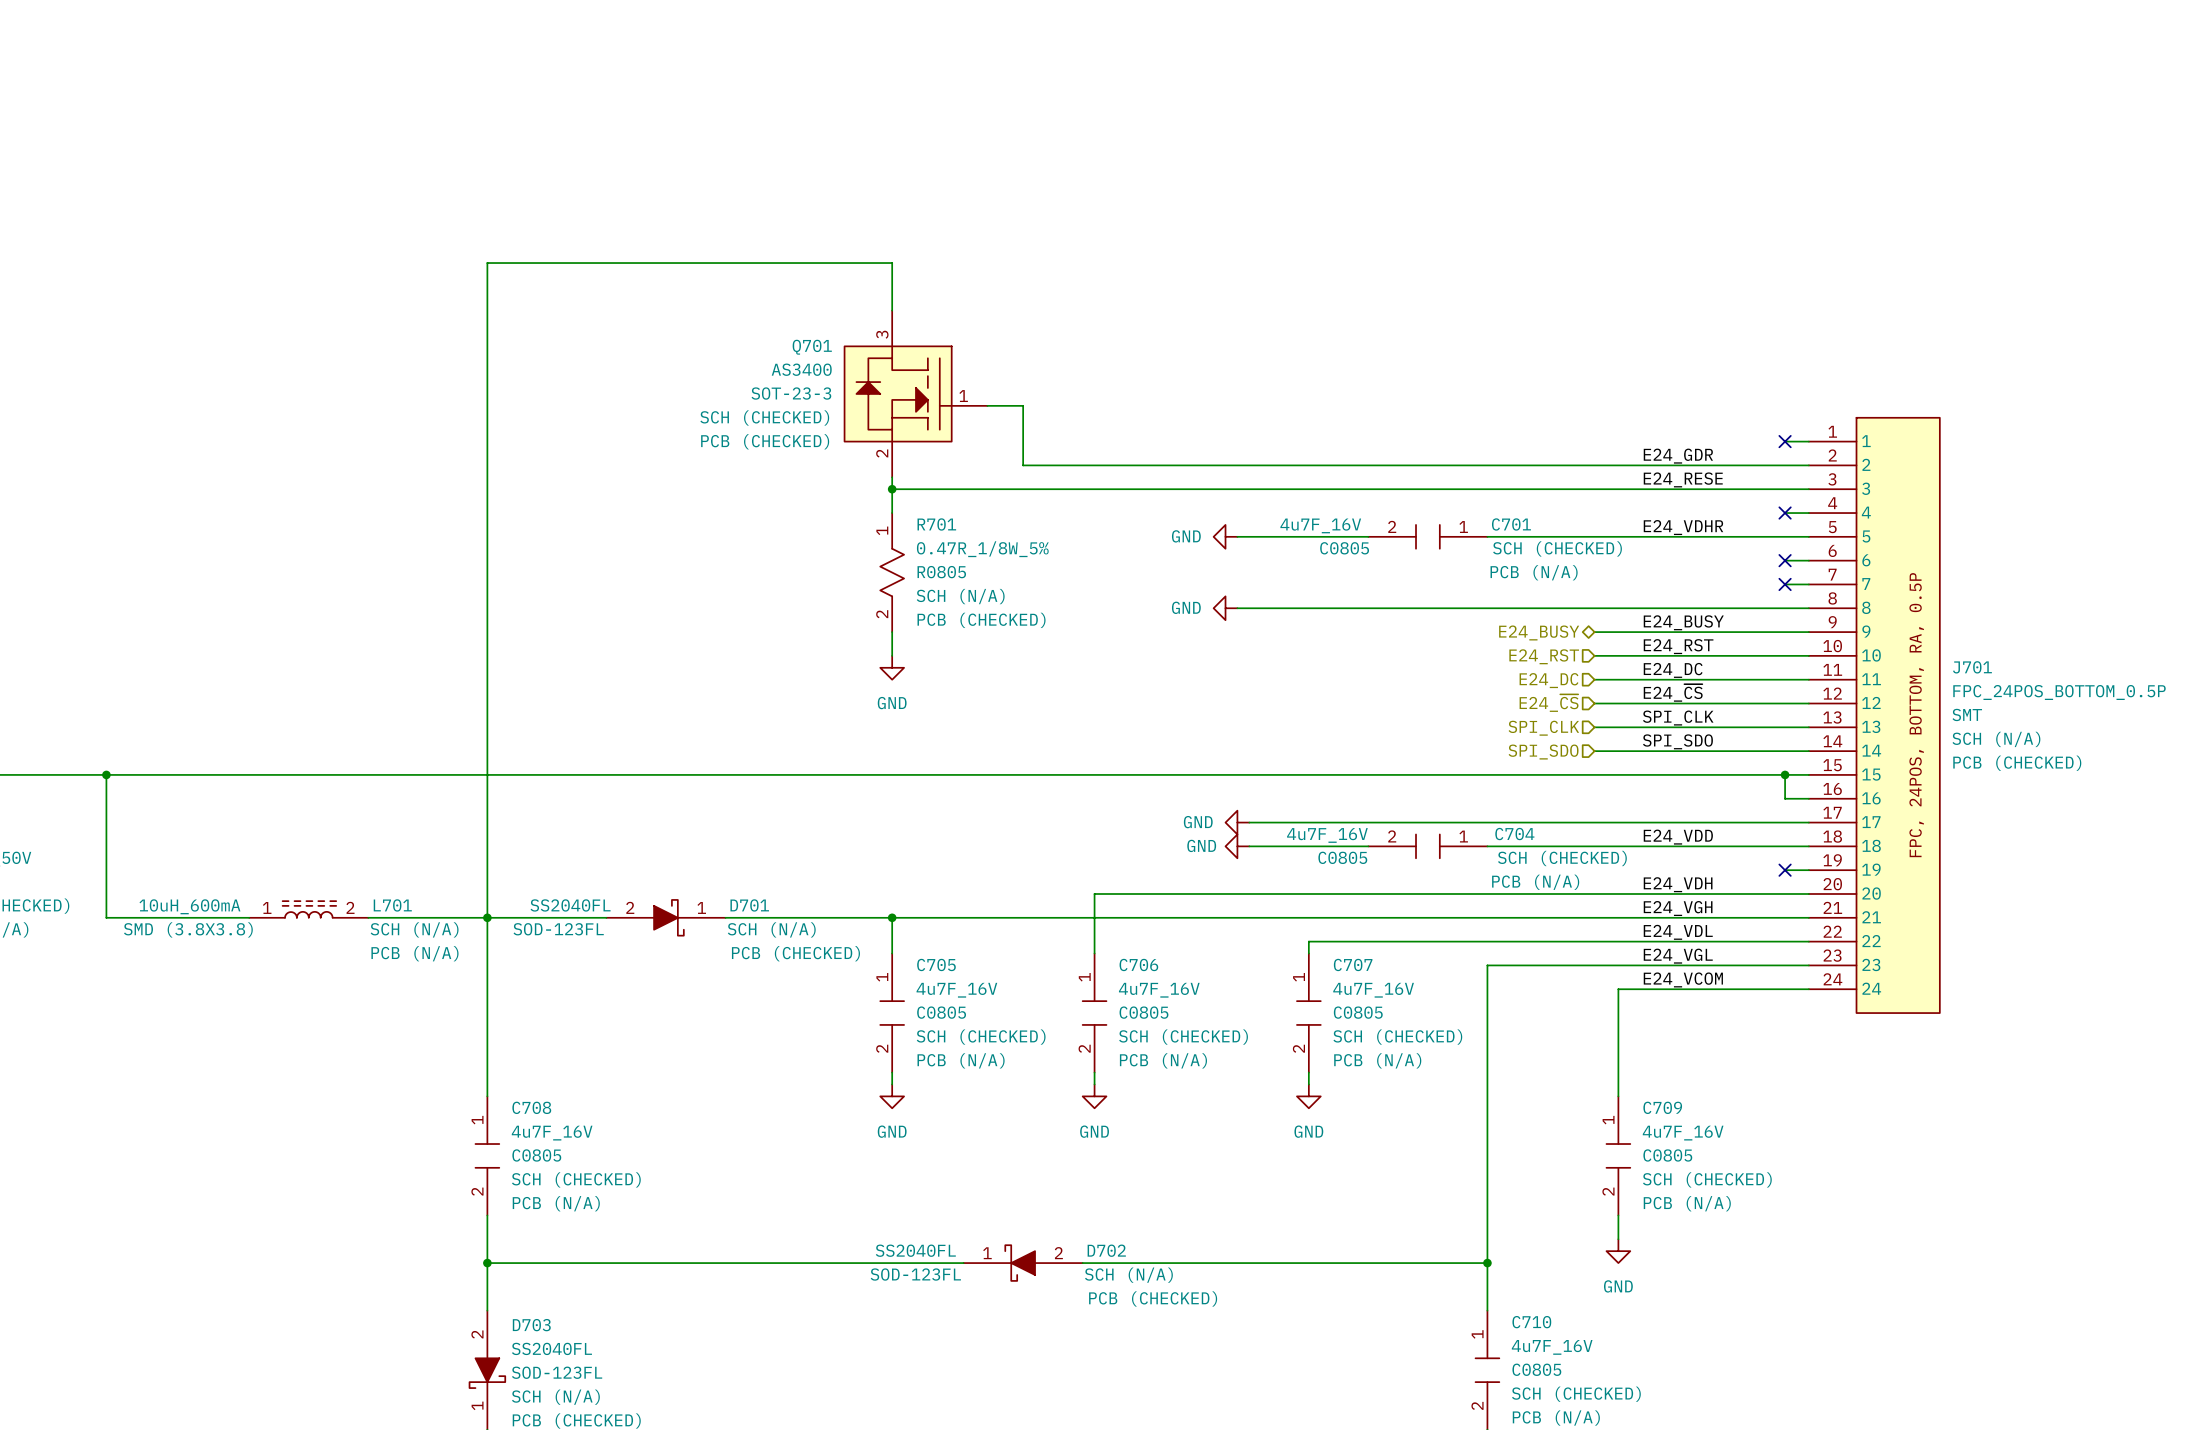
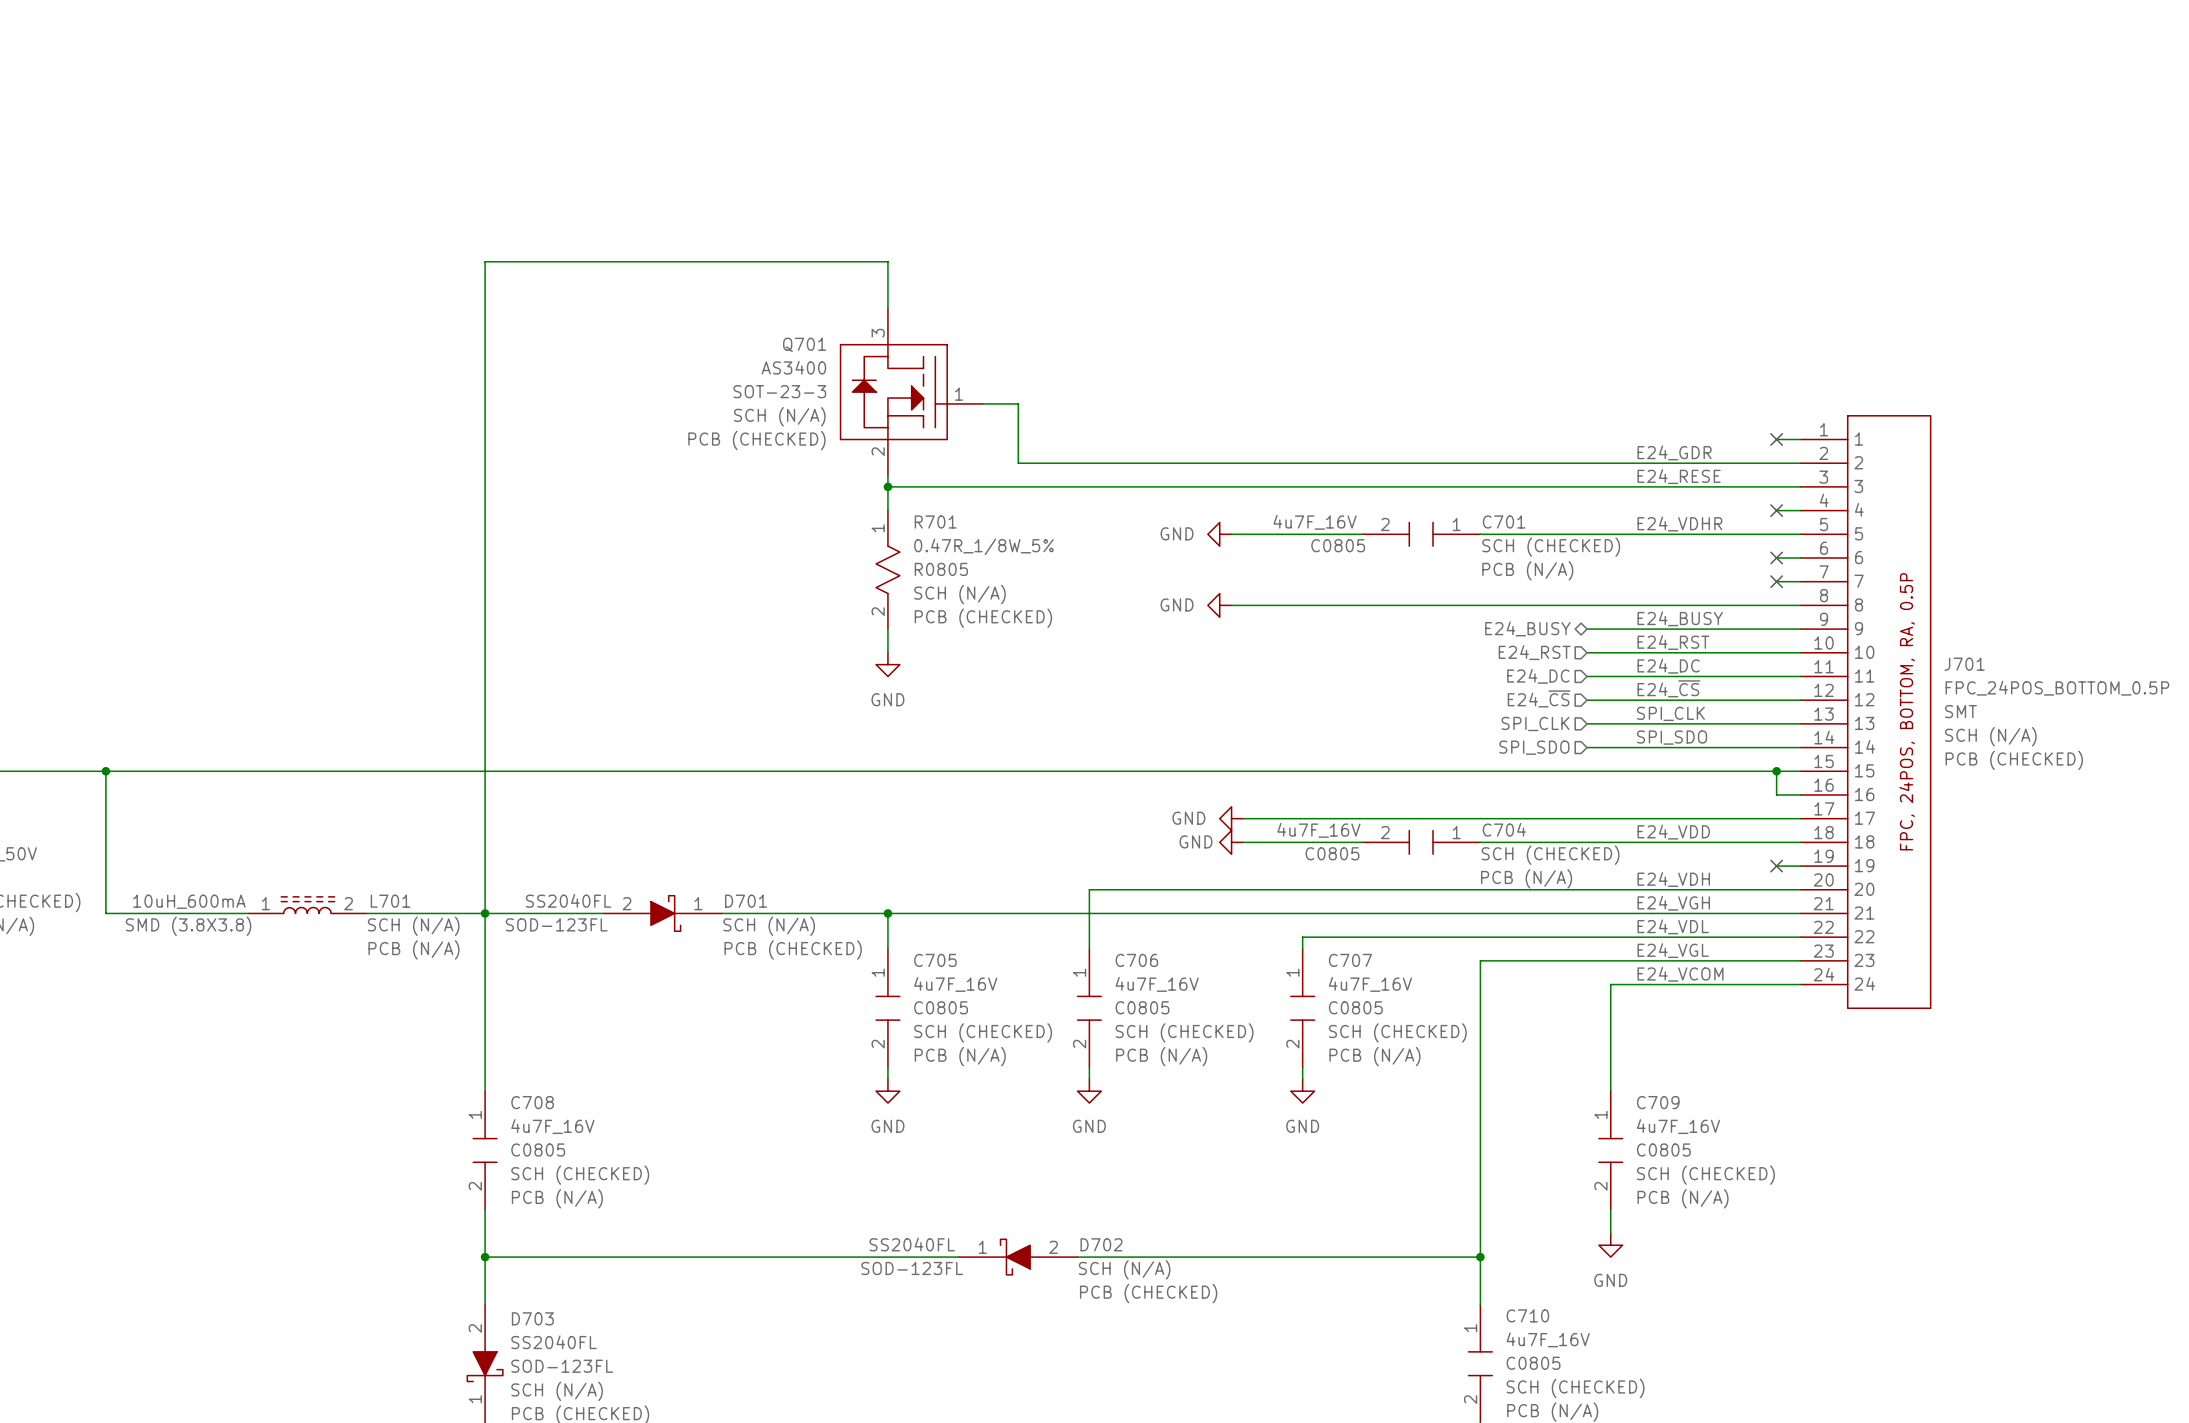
Q701 text: SCH (CHECKED) (764, 417) -> SCH (N/A) (779, 416)

